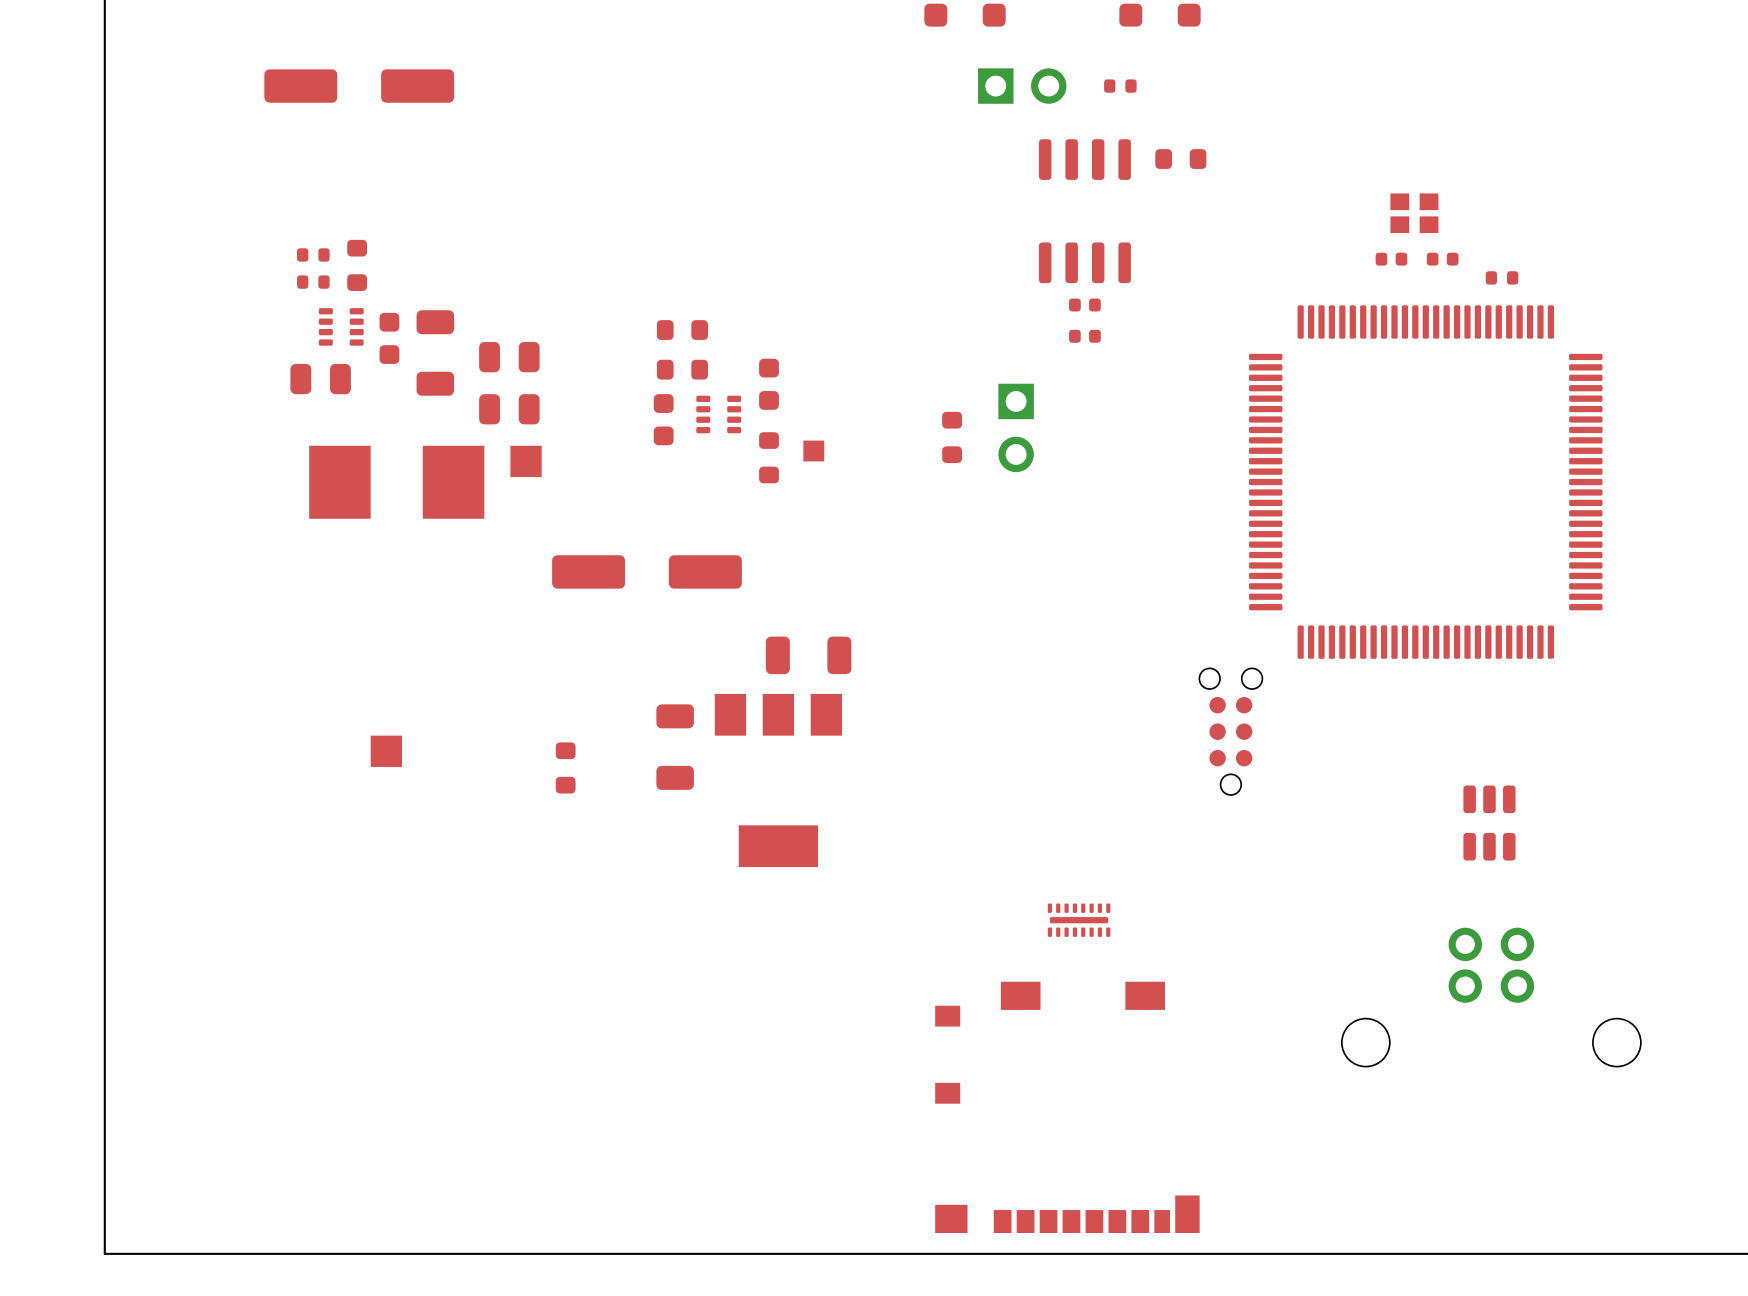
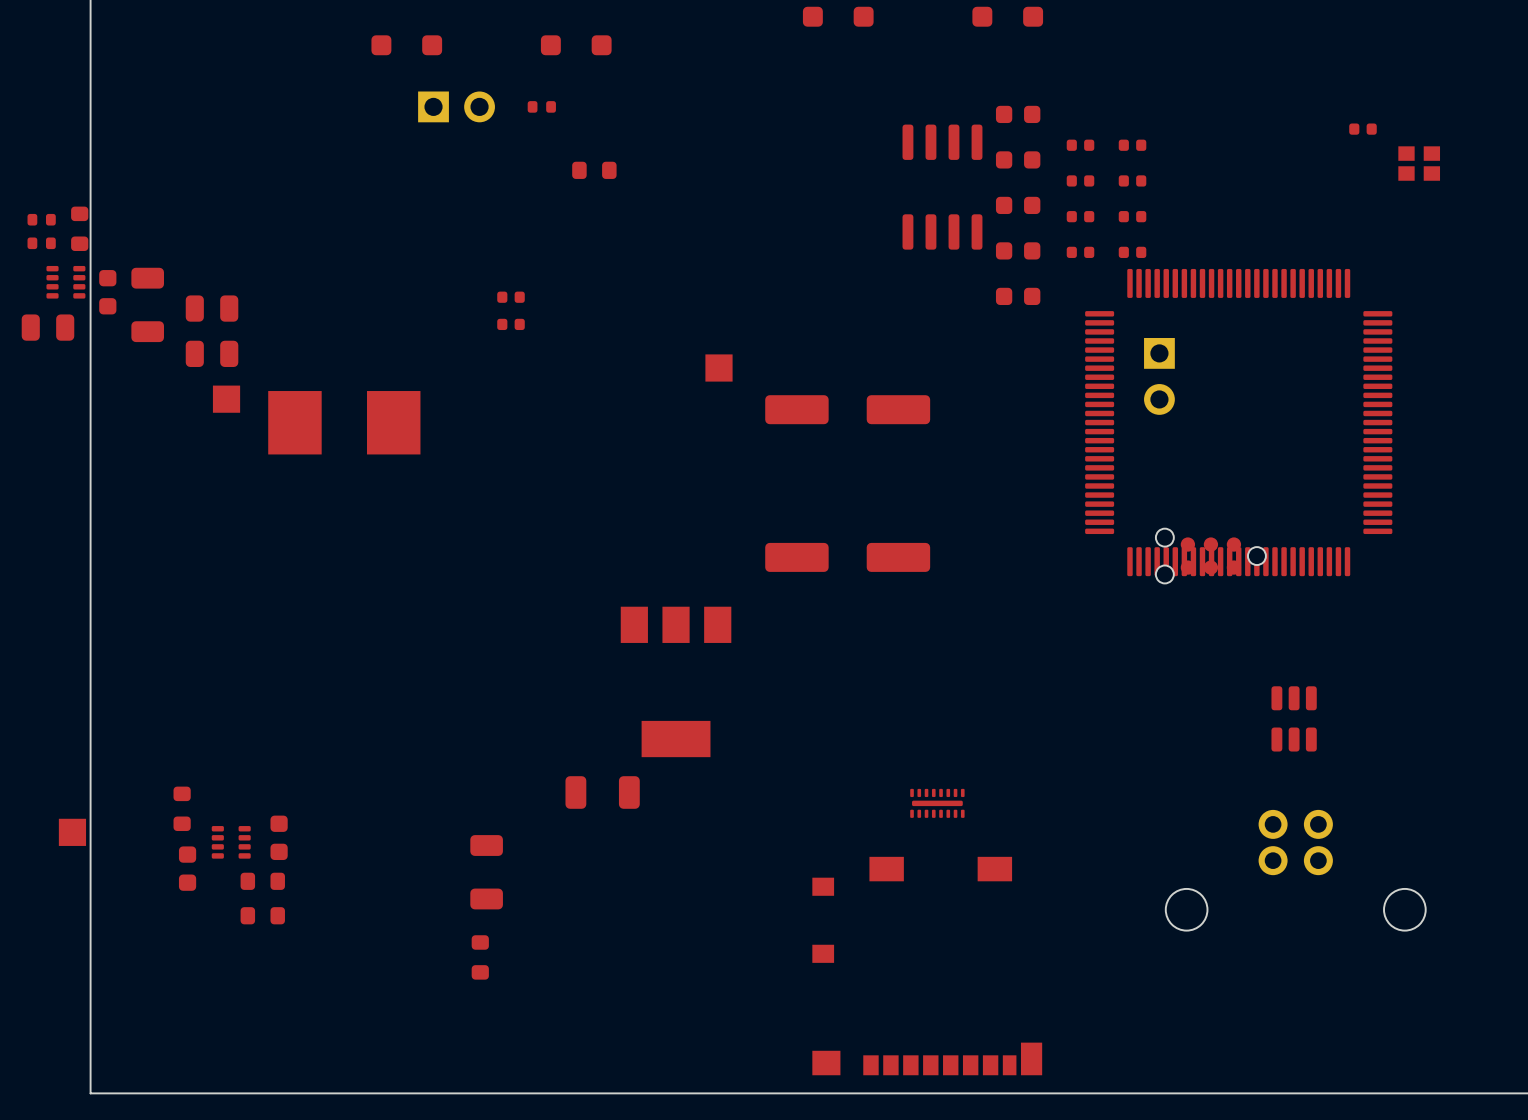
part: none -> (406, 45)
part: none -> (576, 45)
part: (359, 86) -> none
part: (1022, 86) -> none
part: (1120, 86) -> none
part: none -> (456, 106)
part: none -> (541, 106)
part: none -> (1018, 114)
part: none -> (1362, 129)
part: (1180, 159) -> none
part: none -> (1080, 145)
part: none -> (1132, 145)
part: none -> (1018, 159)
part: none -> (594, 170)
part: none -> (1080, 180)
part: none -> (1132, 180)
part position: (1414, 213) -> (1419, 163)
part: none -> (1018, 205)
part: none -> (1080, 216)
part: none -> (1132, 216)
part: none -> (41, 219)
part: (313, 254) -> none
part: none -> (79, 228)
part: (1391, 259) -> none
part: (1442, 259) -> none
part: (357, 265) -> none
part: none -> (41, 243)
part: (1501, 277) -> none
part: (313, 282) -> none
part: none -> (1018, 250)
part: none -> (1080, 252)
part: none -> (1132, 252)
part: (1084, 305) -> none
part position: (341, 326) -> (65, 282)
part: (682, 330) -> none
part: (1084, 336) -> none
part: none -> (1018, 296)
part: none -> (511, 297)
part position: (389, 338) -> (107, 292)
part: none -> (212, 308)
part position: (435, 352) -> (147, 304)
part: (509, 357) -> none
part: none -> (511, 324)
part: (682, 369) -> none
part: none -> (47, 327)
part: (320, 379) -> none
part: (768, 384) -> none
part: none -> (212, 353)
part: (509, 409) -> none
part: (718, 414) -> none
part: (663, 419) -> none
part: none -> (718, 368)
part: (1016, 427) -> none
part: none -> (1159, 376)
part: (952, 437) -> none
part: (813, 450) -> none
part: none -> (226, 399)
part: (768, 457) -> none
part: (526, 461) -> none
part: none -> (847, 409)
part: (646, 571) -> none
part: none -> (847, 557)
part: (808, 655) -> none
part rotation: 0° (1230, 731) -> 90° counterclockwise (1210, 556)
part position: (1230, 731) -> (1210, 556)
part: (675, 747) -> none
part: (386, 751) -> none
part: (565, 767) -> none
part: none -> (602, 792)
part: none -> (182, 808)
part: none -> (72, 832)
part: none -> (279, 837)
part: none -> (231, 842)
part: none -> (187, 868)
part: none -> (486, 872)
part: none -> (262, 881)
part: none -> (262, 915)
part: none -> (480, 957)

